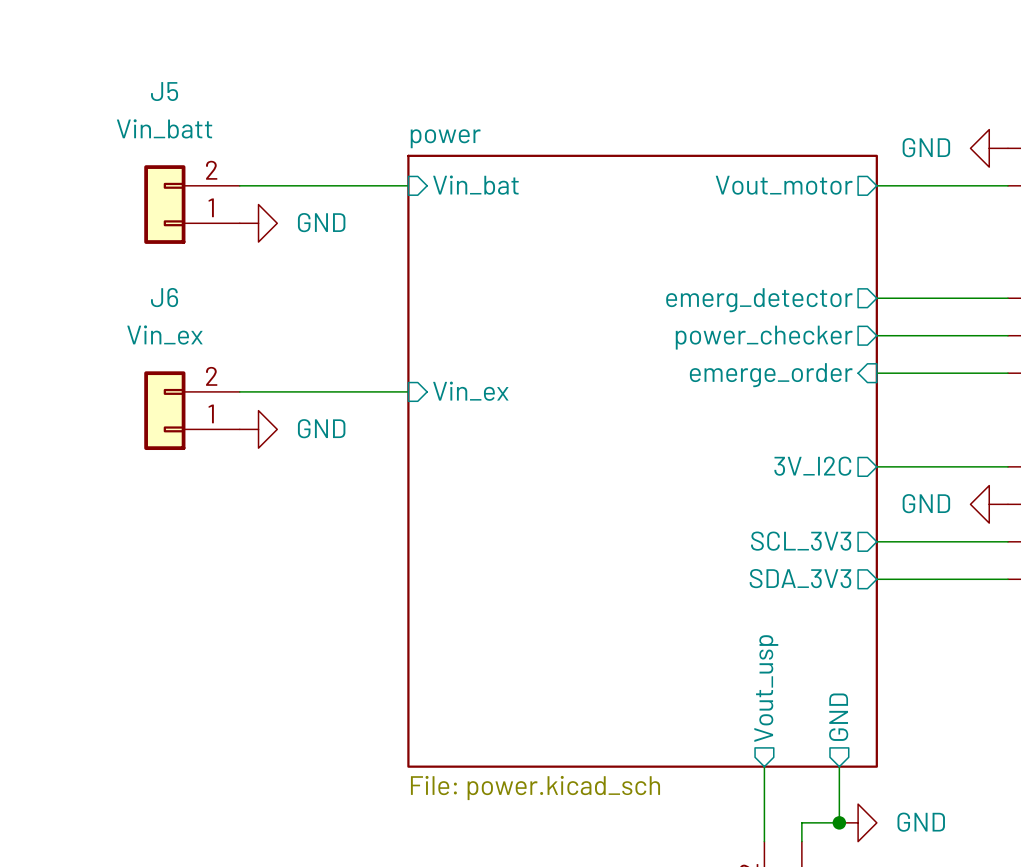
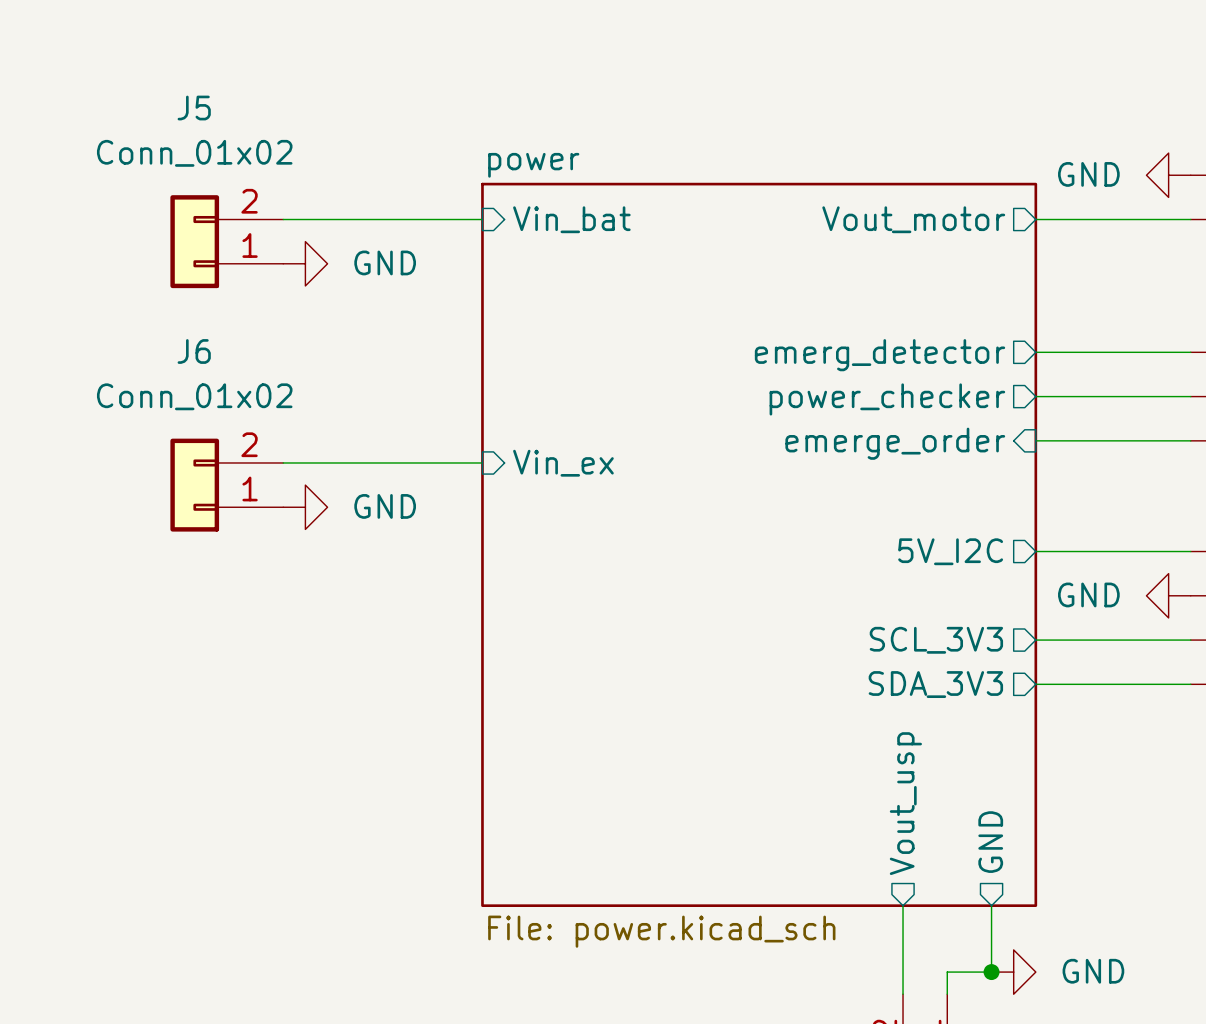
J5 value: Vin_batt (164, 128) -> Conn_01x02 (194, 153)
J6 value: Vin_ex (164, 335) -> Conn_01x02 (194, 396)
sheet pin: 3V_I2C (812, 466) -> 5V_I2C (950, 551)

